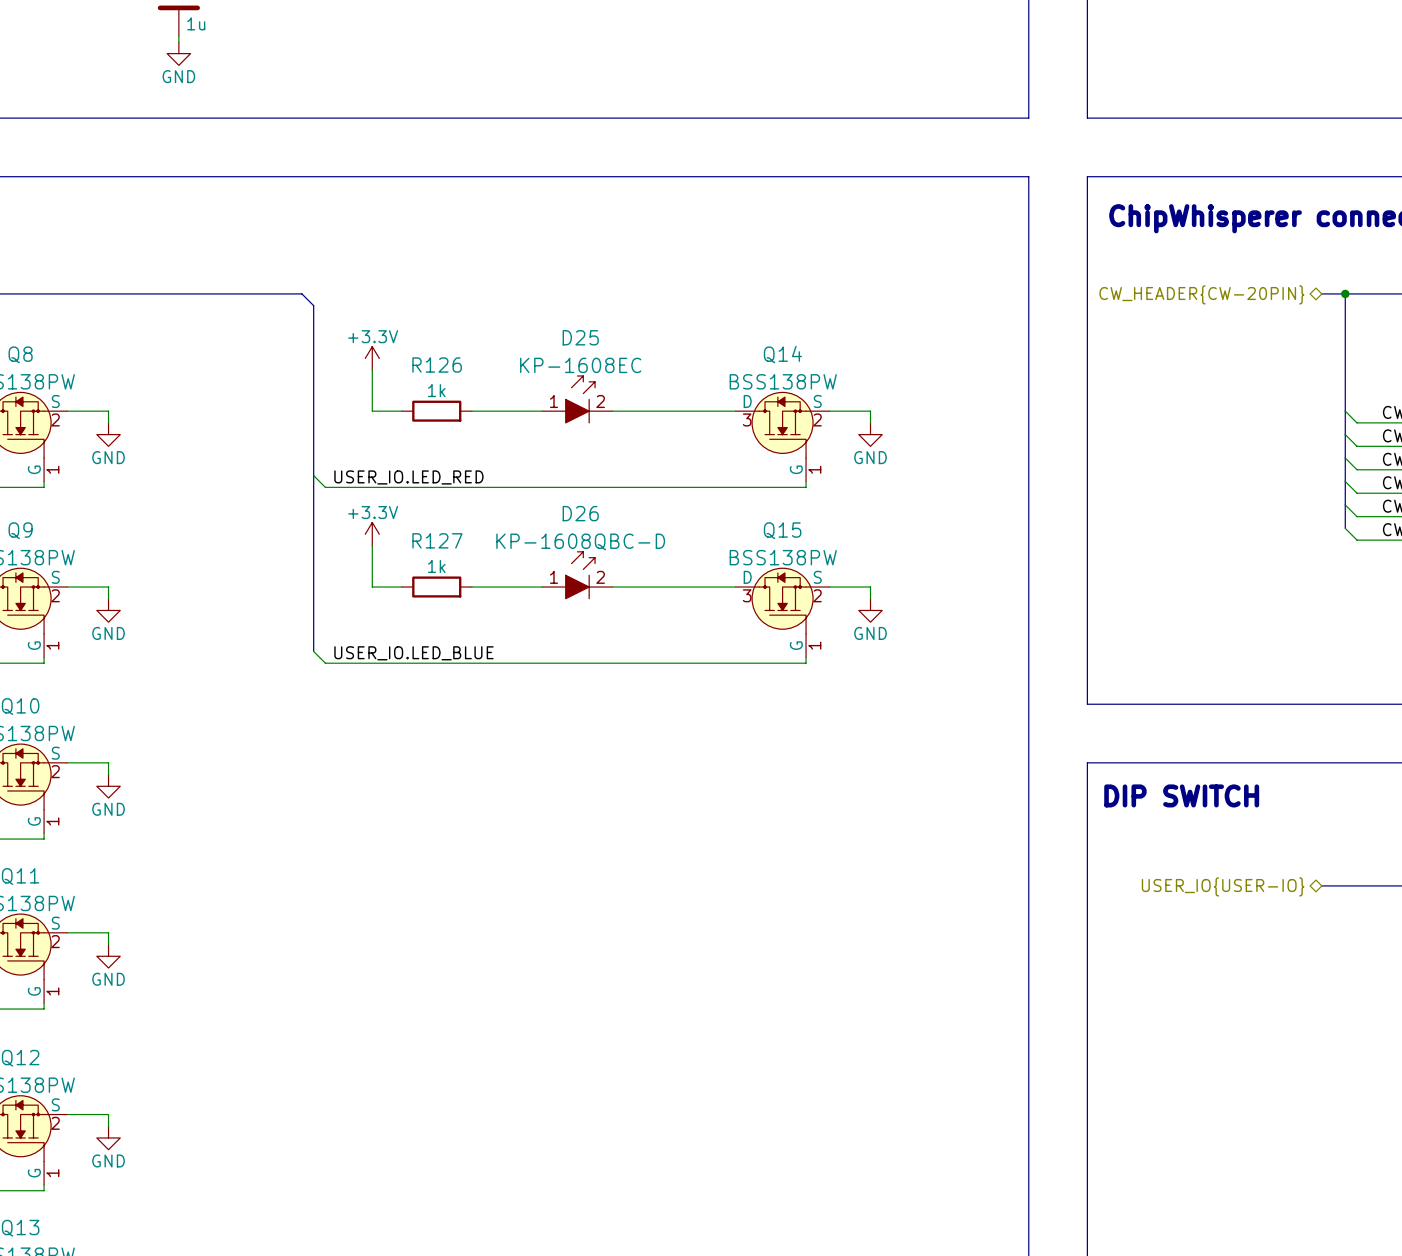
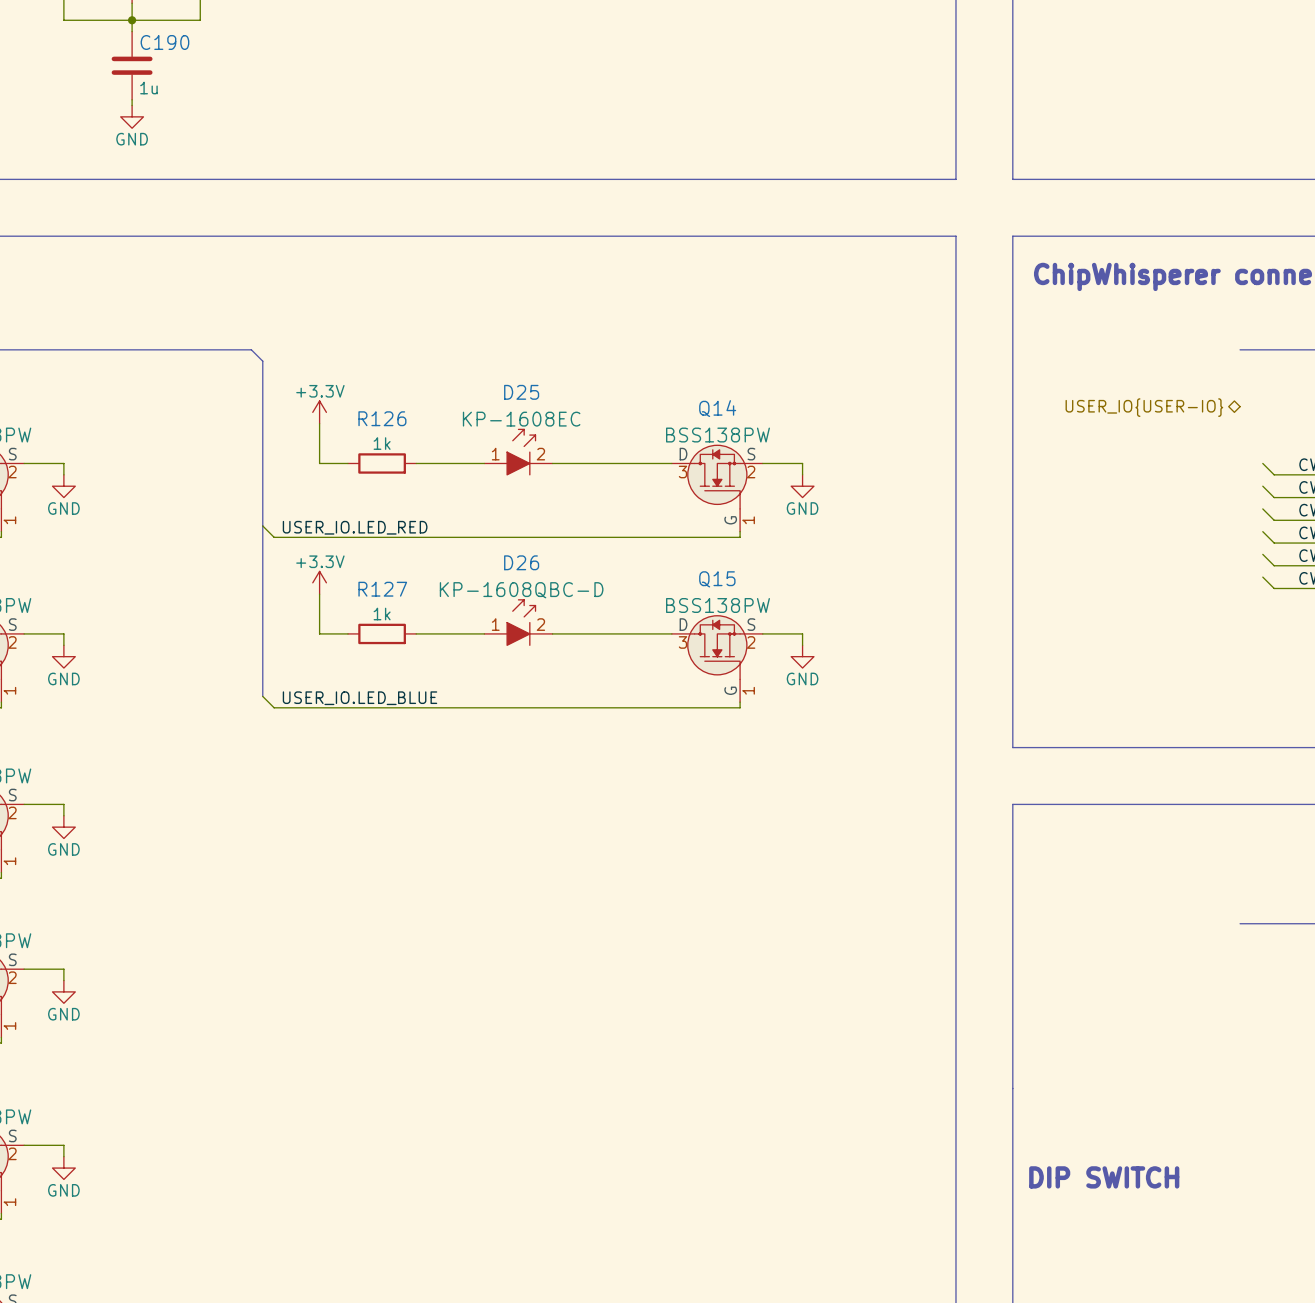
bus: (1345, 293) (1345, 528) -> none
junction: (1345, 293) -> none
hierarchical label: CW_HEADER{CW-20PIN} (1201, 294) -> none
hierarchical label: none -> USER_IO{USER-IO} (1144, 407)
text: DIP SWITCH (1181, 795) -> none
hierarchical label: USER_IO{USER-IO} (1223, 886) -> none
text: none -> DIP SWITCH (1104, 1177)

